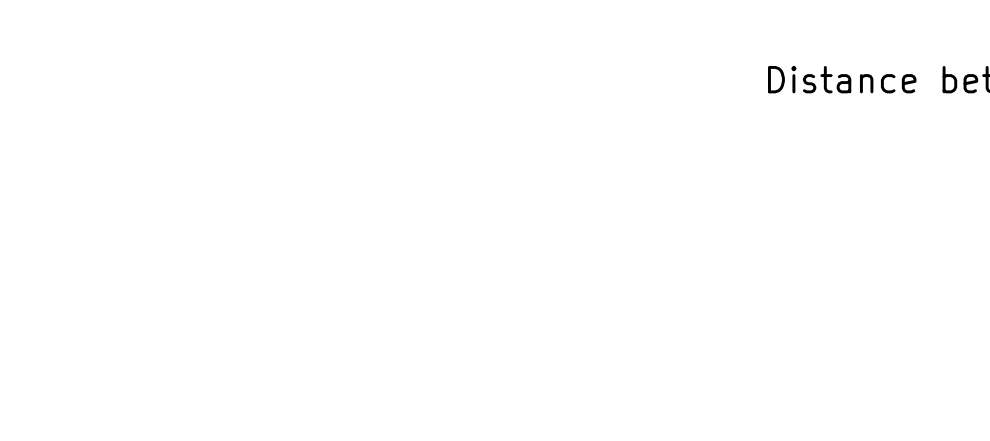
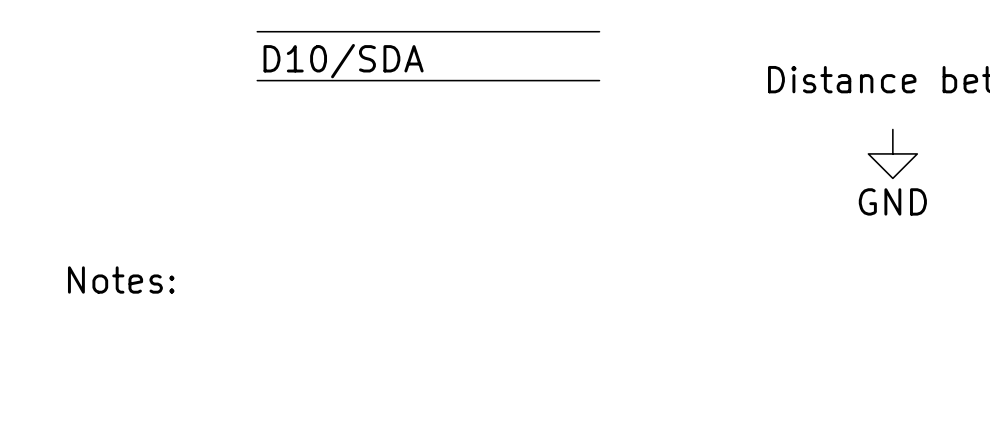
wire: none -> (257, 31) (599, 31)
label: none -> D10/SDA (343, 61)
wire: none -> (257, 80) (599, 80)
power symbol: none -> GND (892, 153)
text: none -> Notes: (121, 279)

